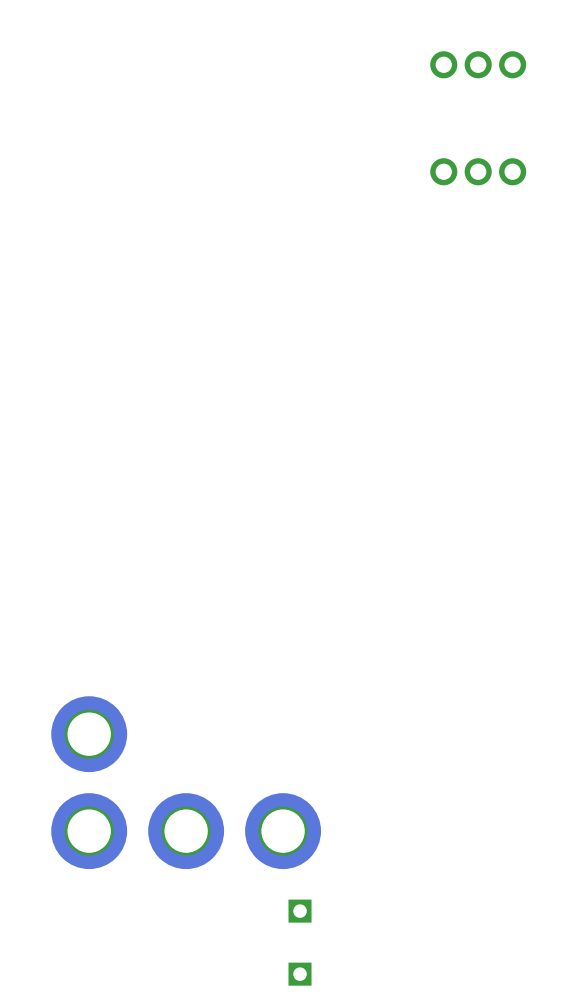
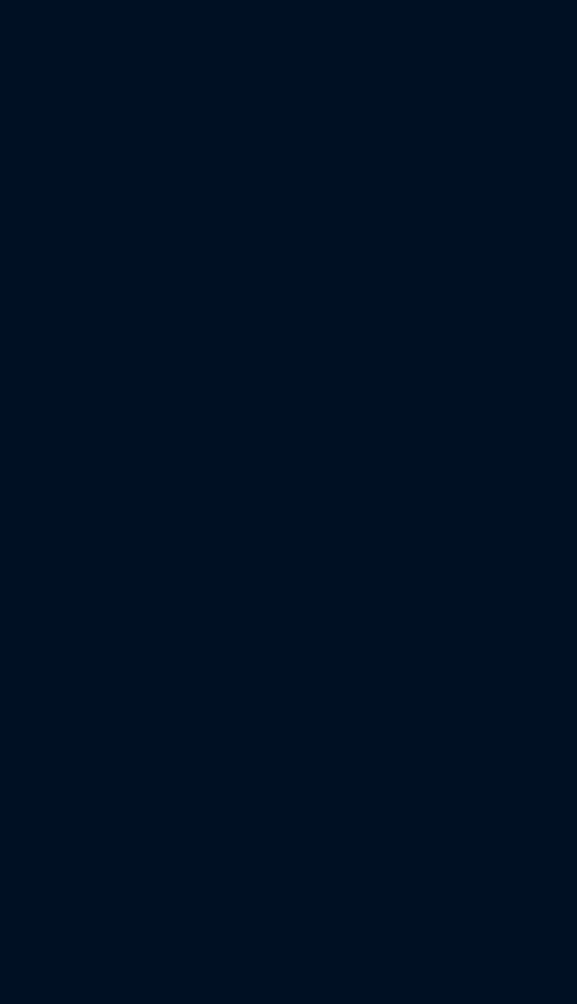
part: (478, 64) -> none
part: (478, 171) -> none
part: (89, 734) -> none
part: (89, 831) -> none
part: (186, 831) -> none
part: (283, 831) -> none
part: (300, 911) -> none
part: (300, 974) -> none

